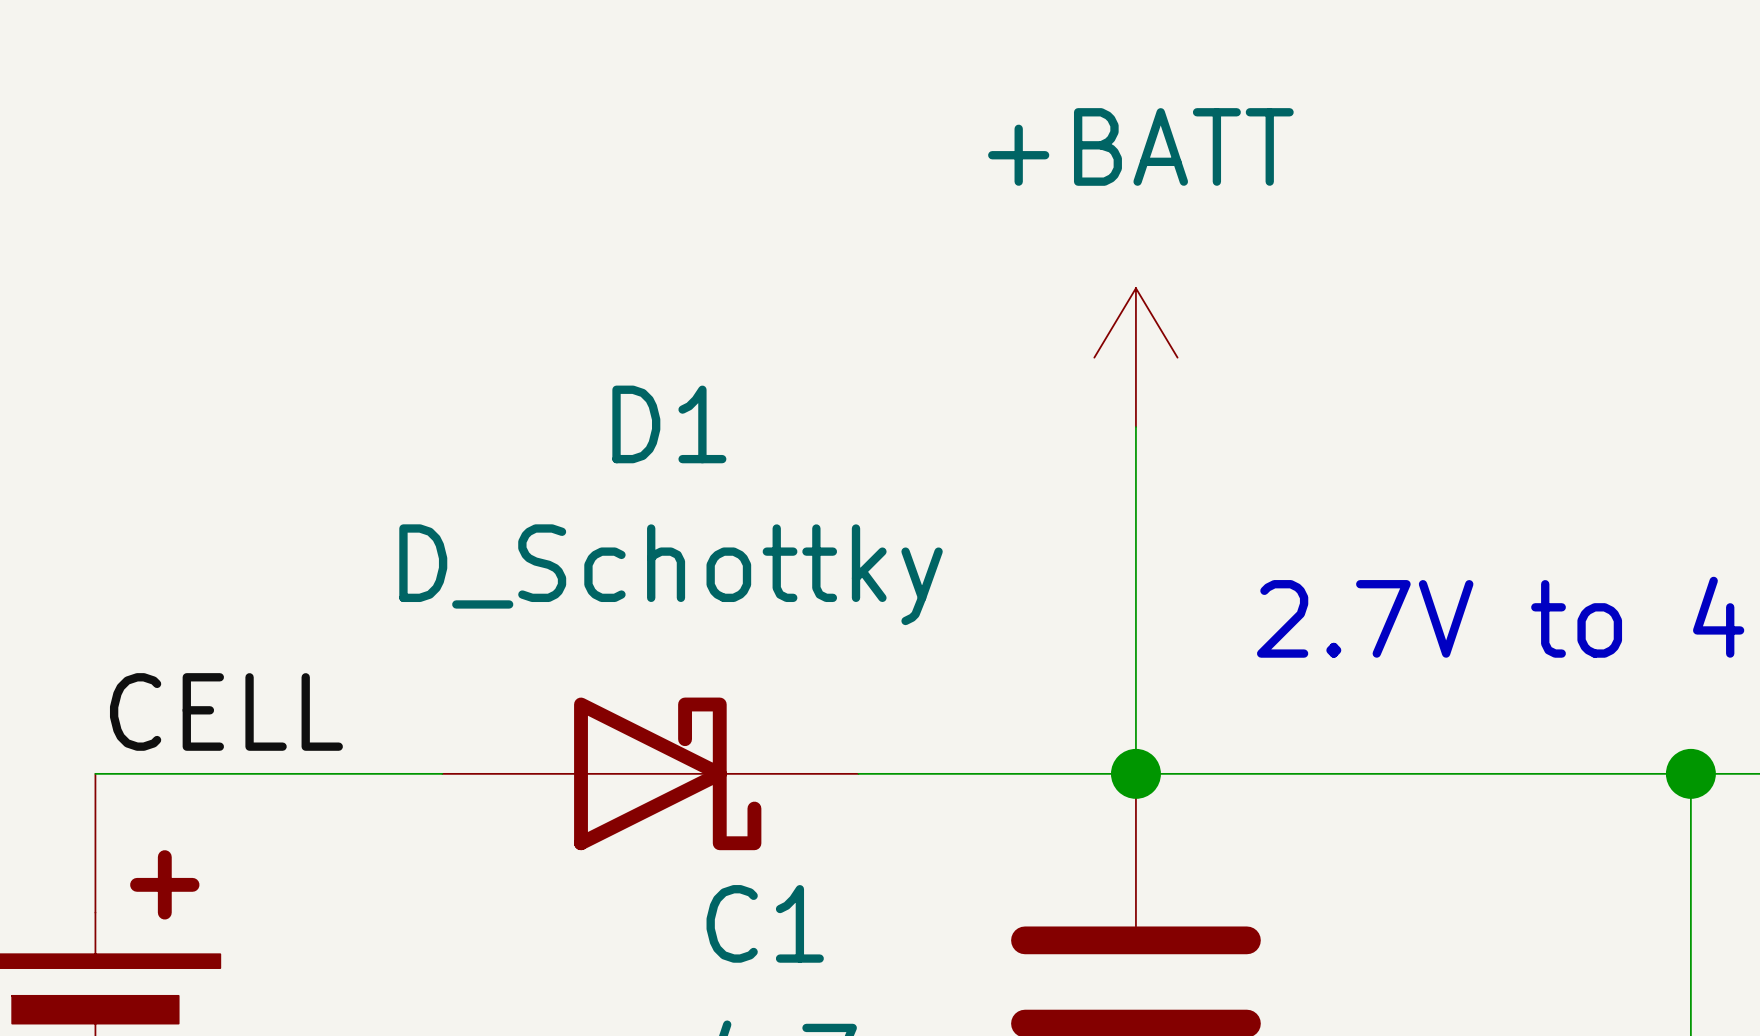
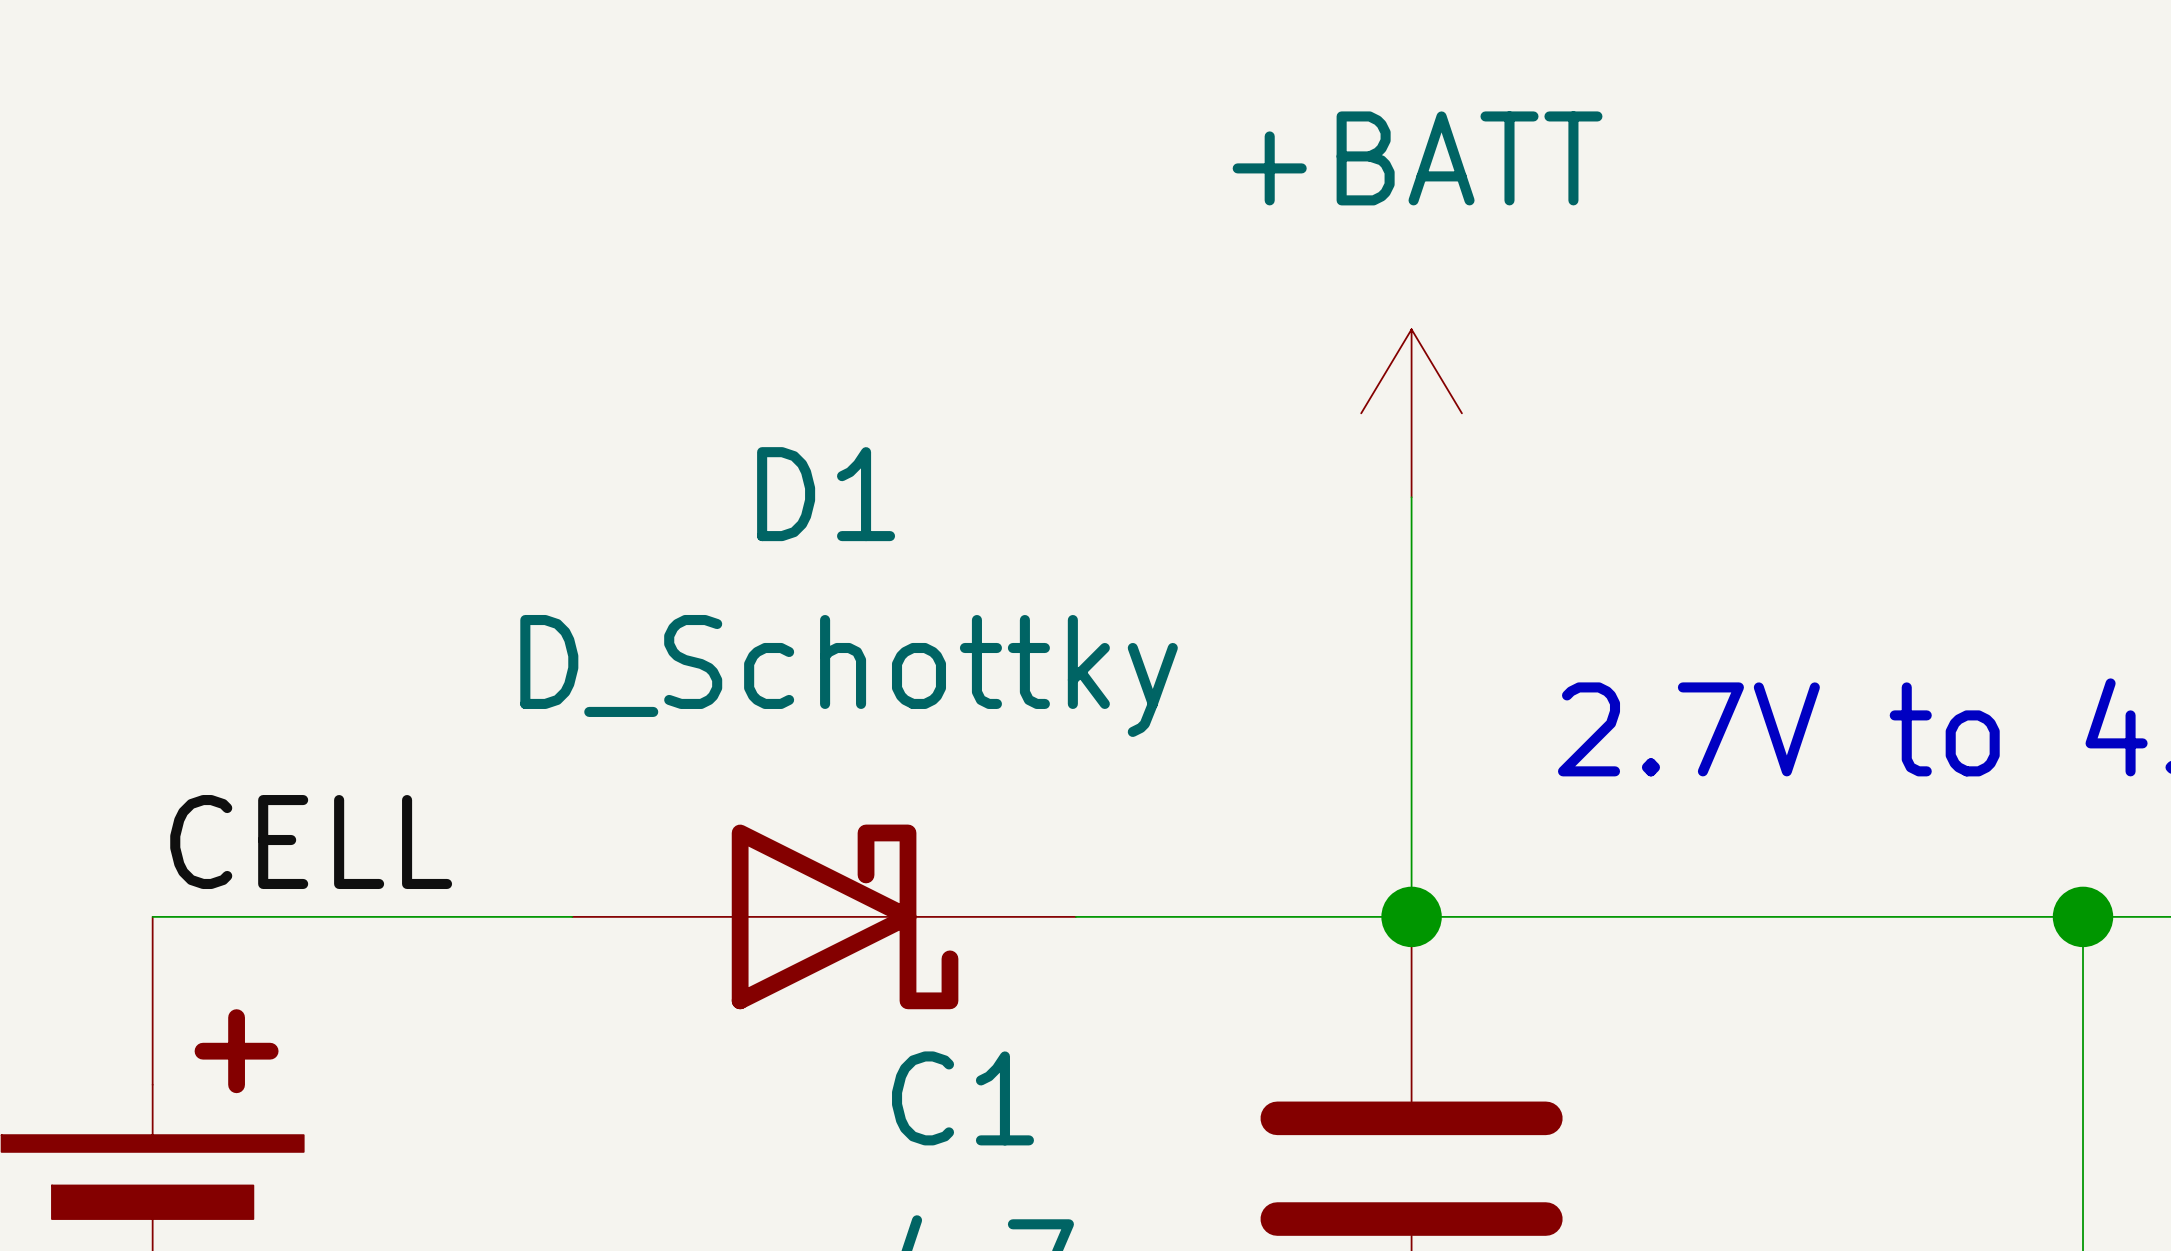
D1 name position: D1 (669, 424) -> D1 (826, 494)

